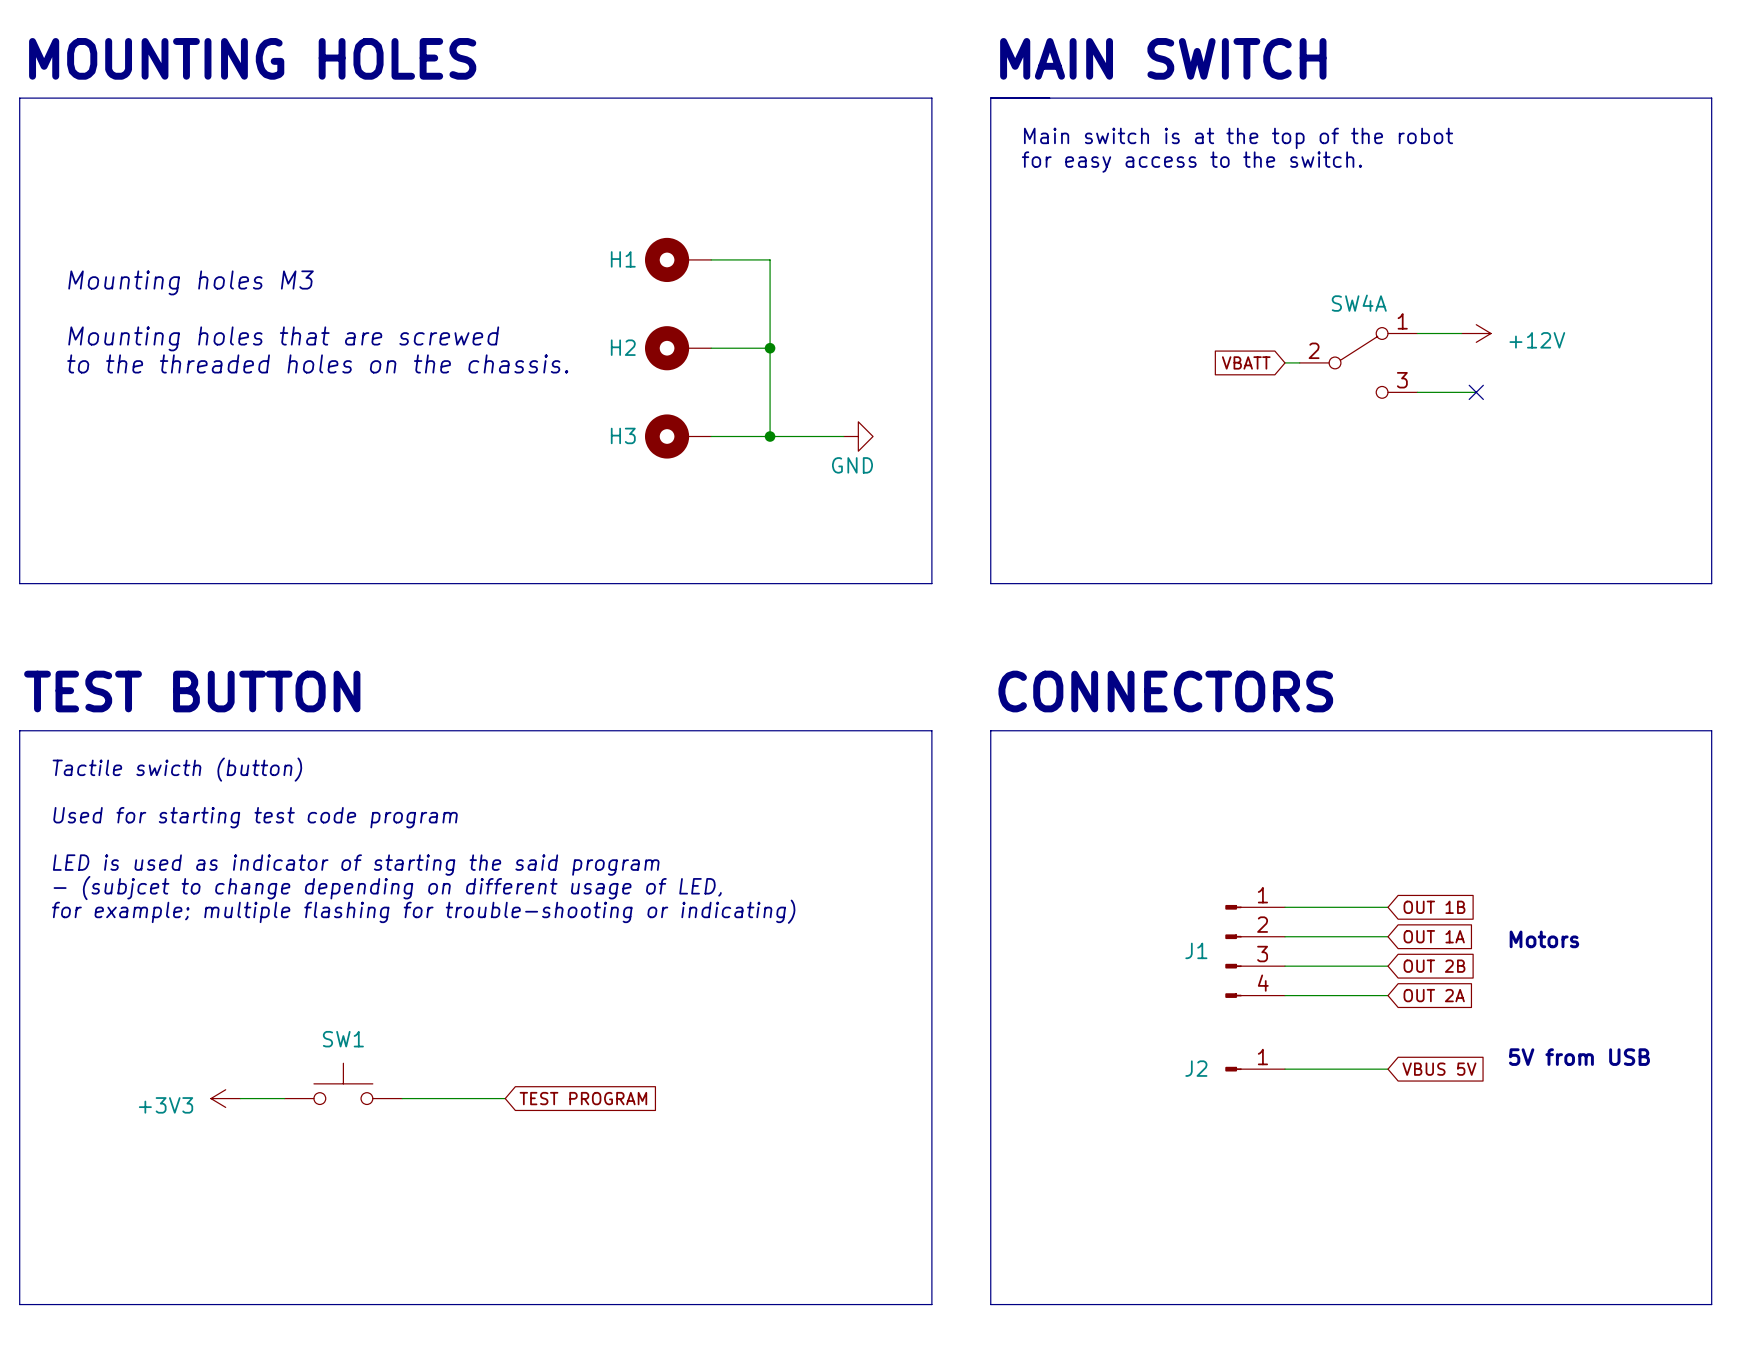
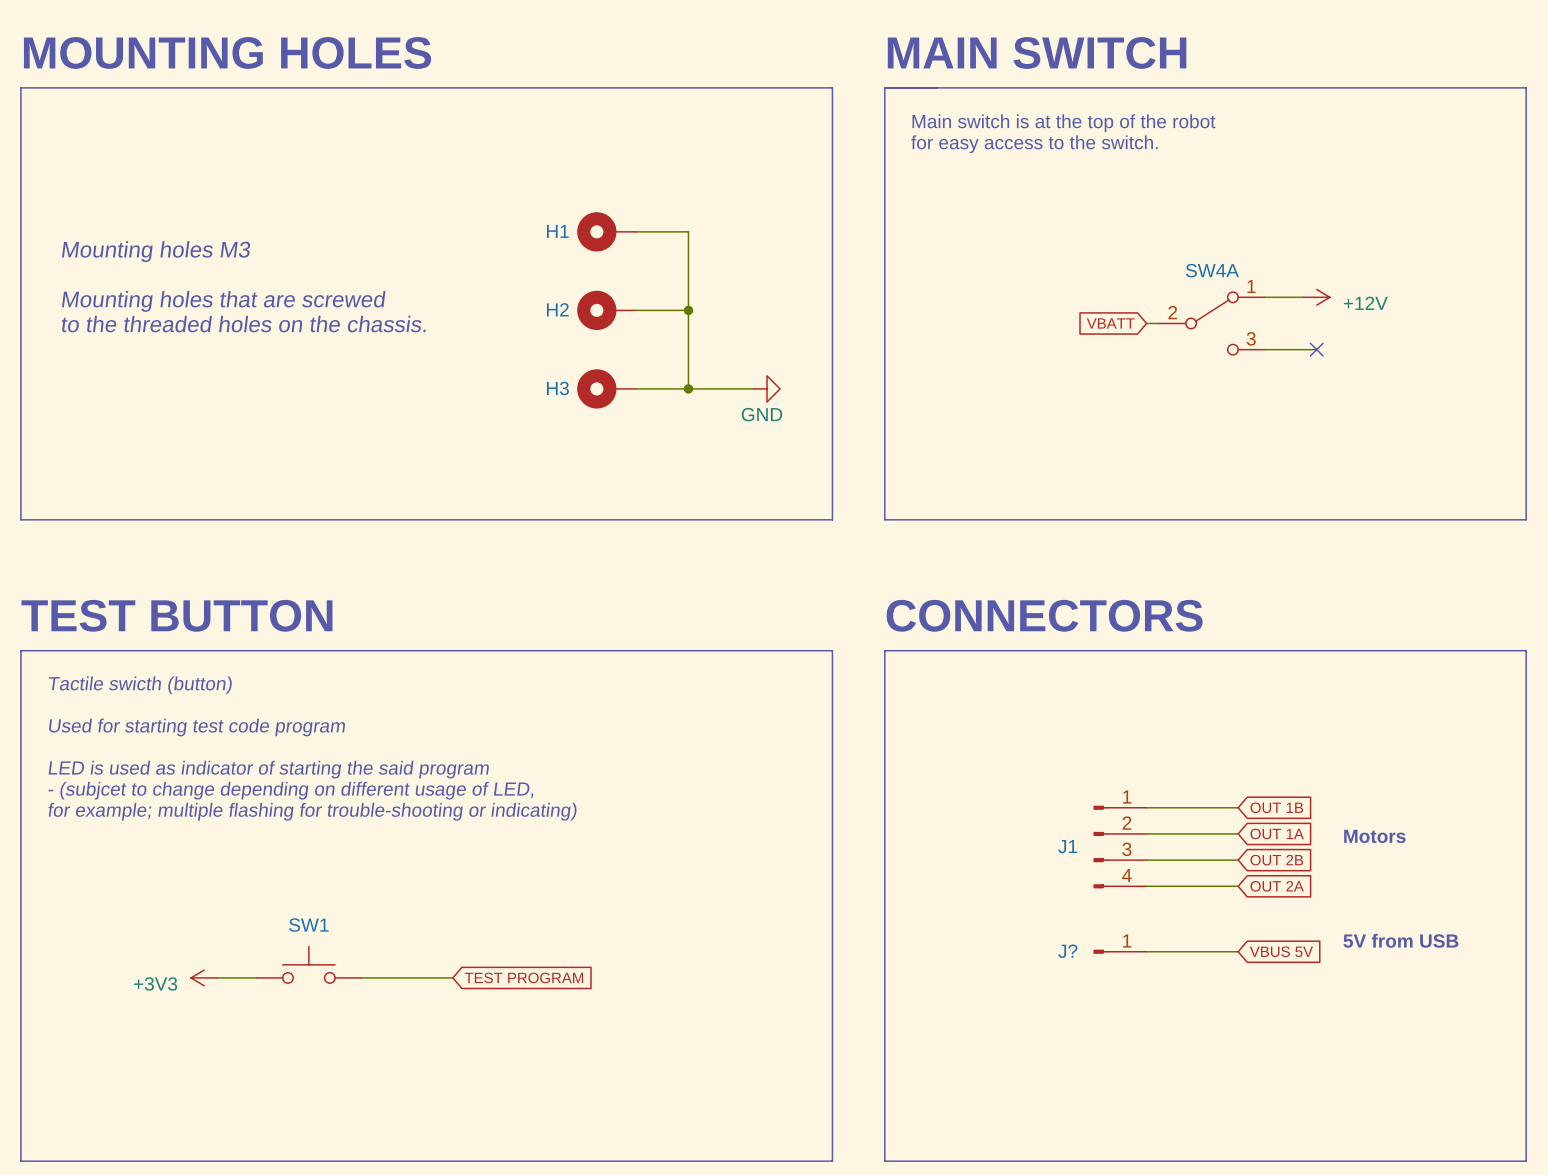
J2 name: J2 (1196, 1068) -> J? (1067, 951)

